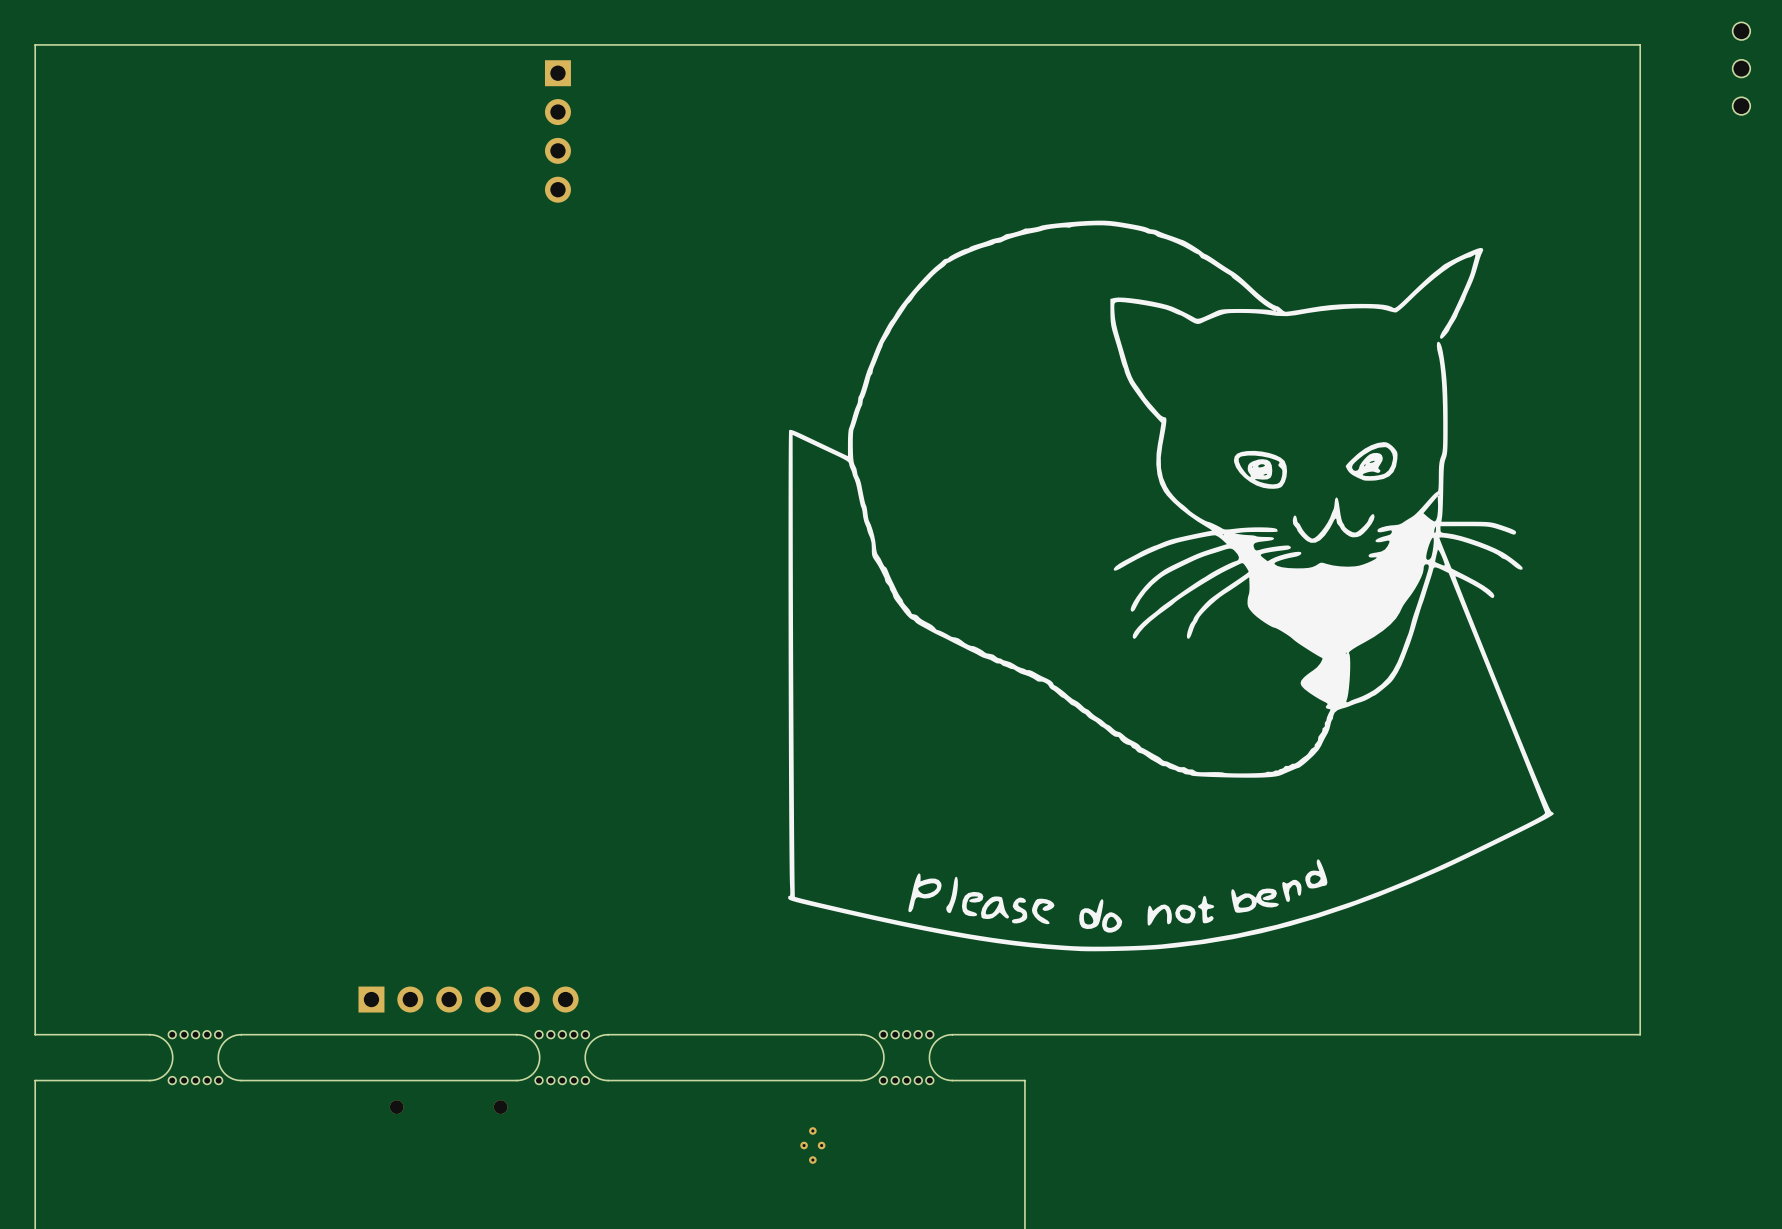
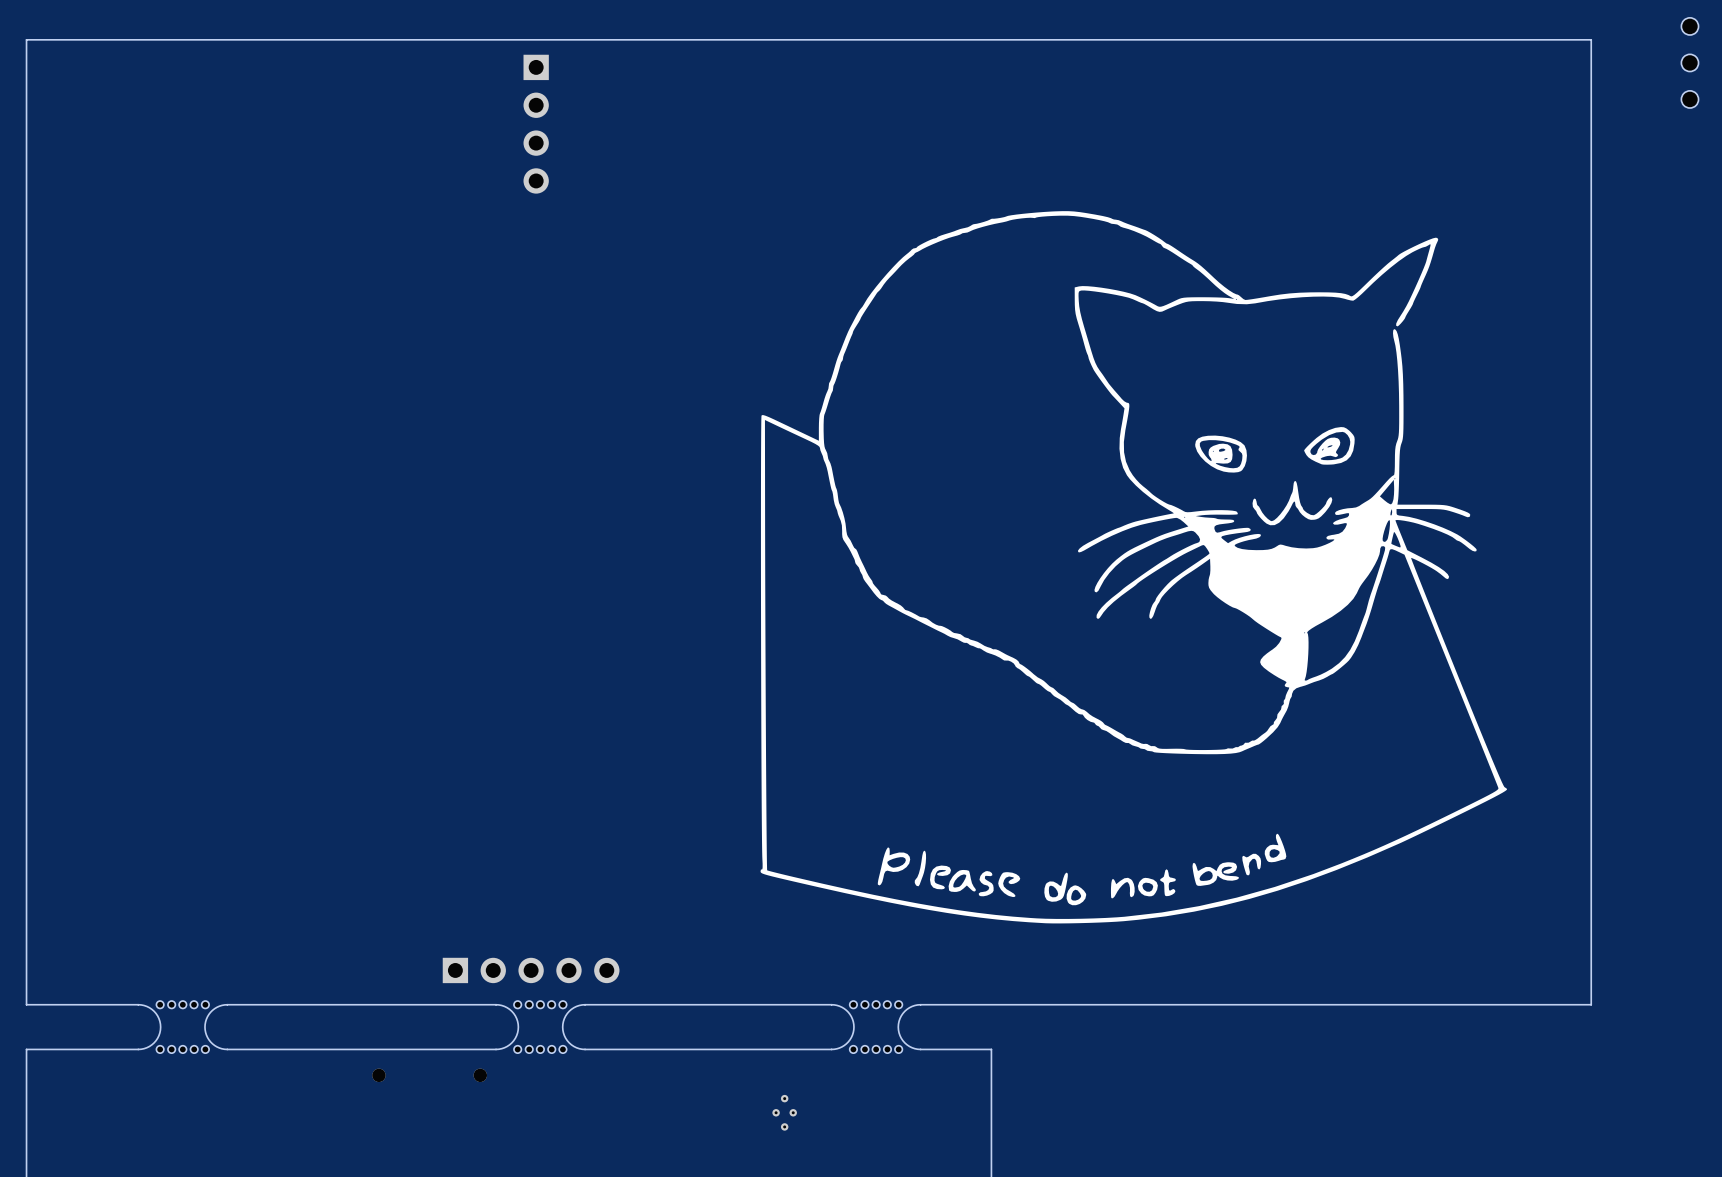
part: (468, 999) -> none
part: none -> (531, 970)

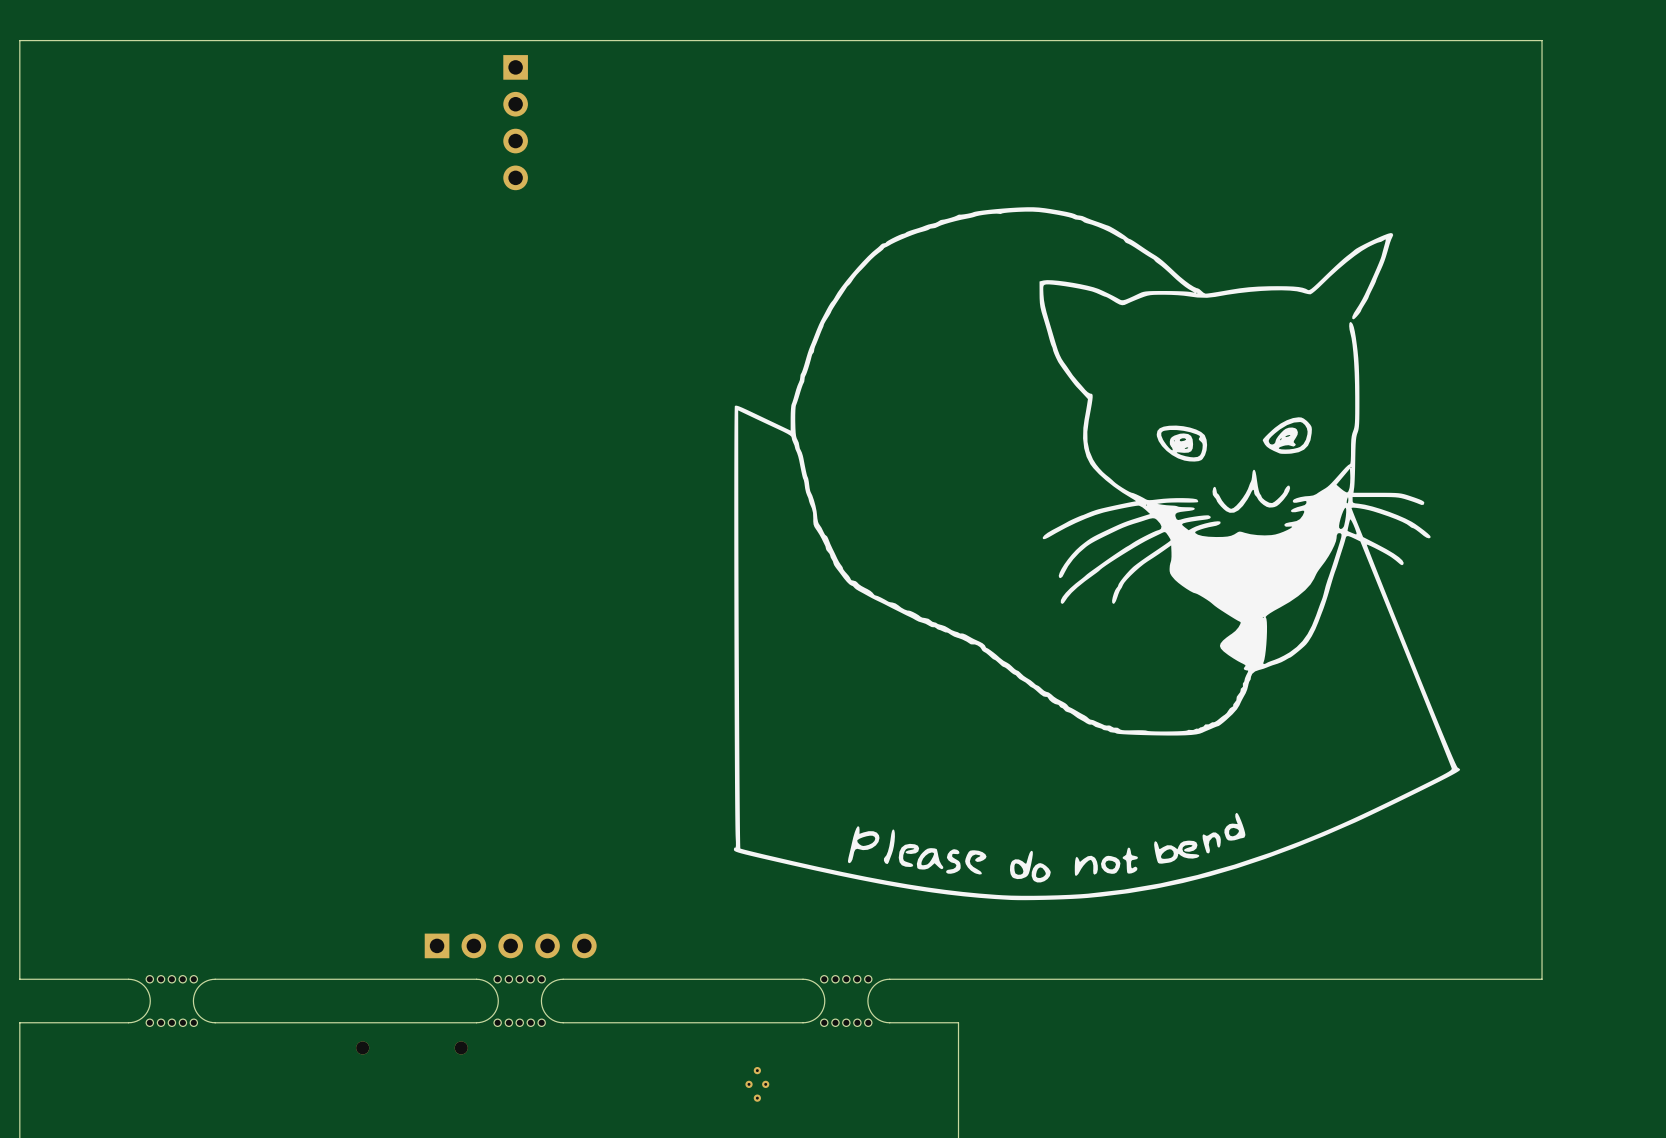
part: (1689, 26) -> none
part: (1689, 62) -> none
part: (1689, 99) -> none

